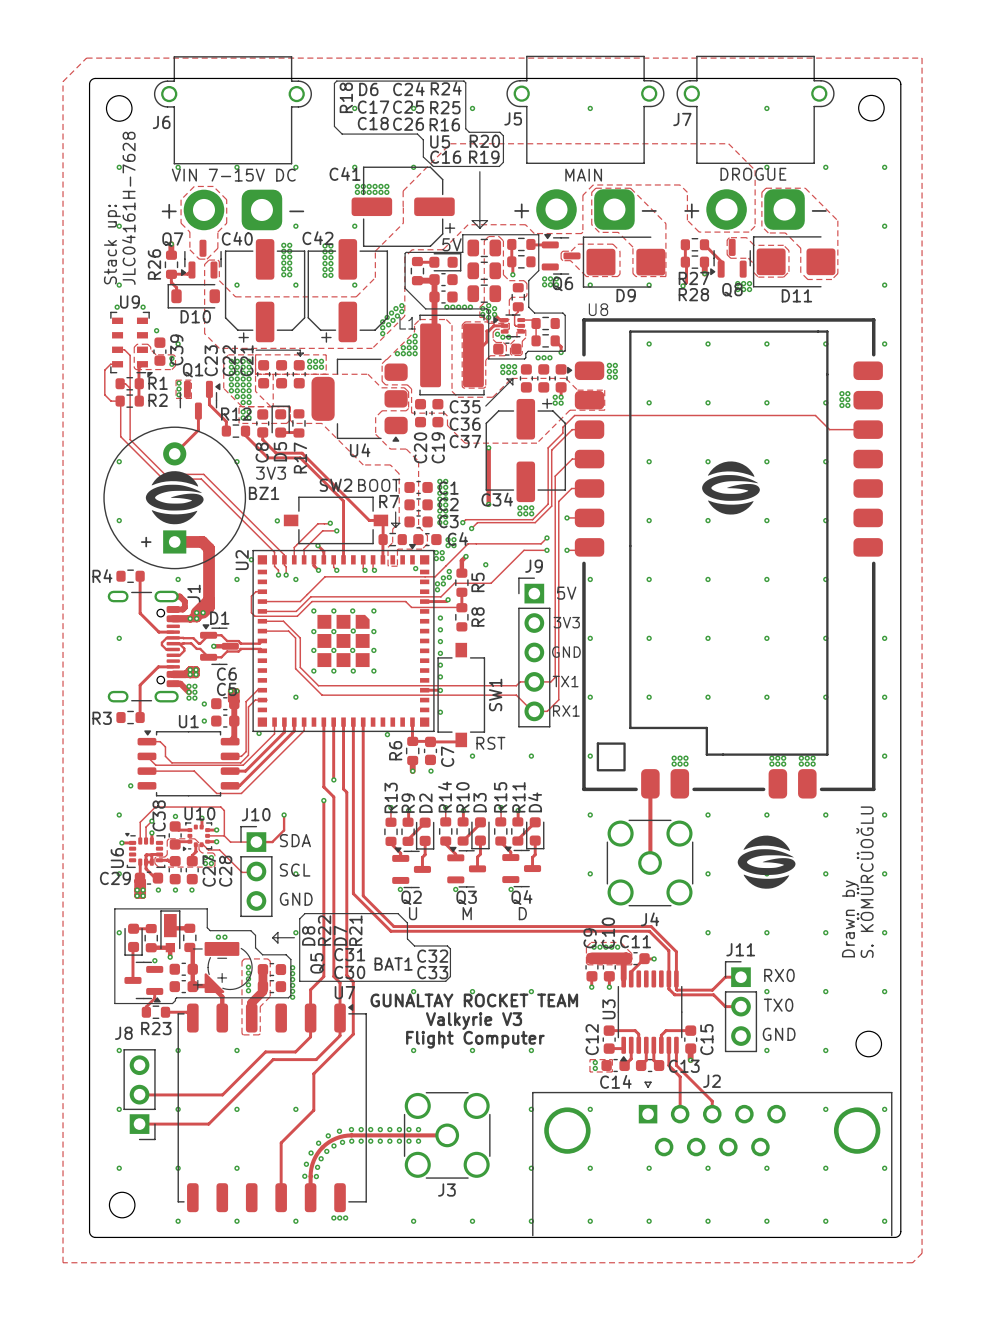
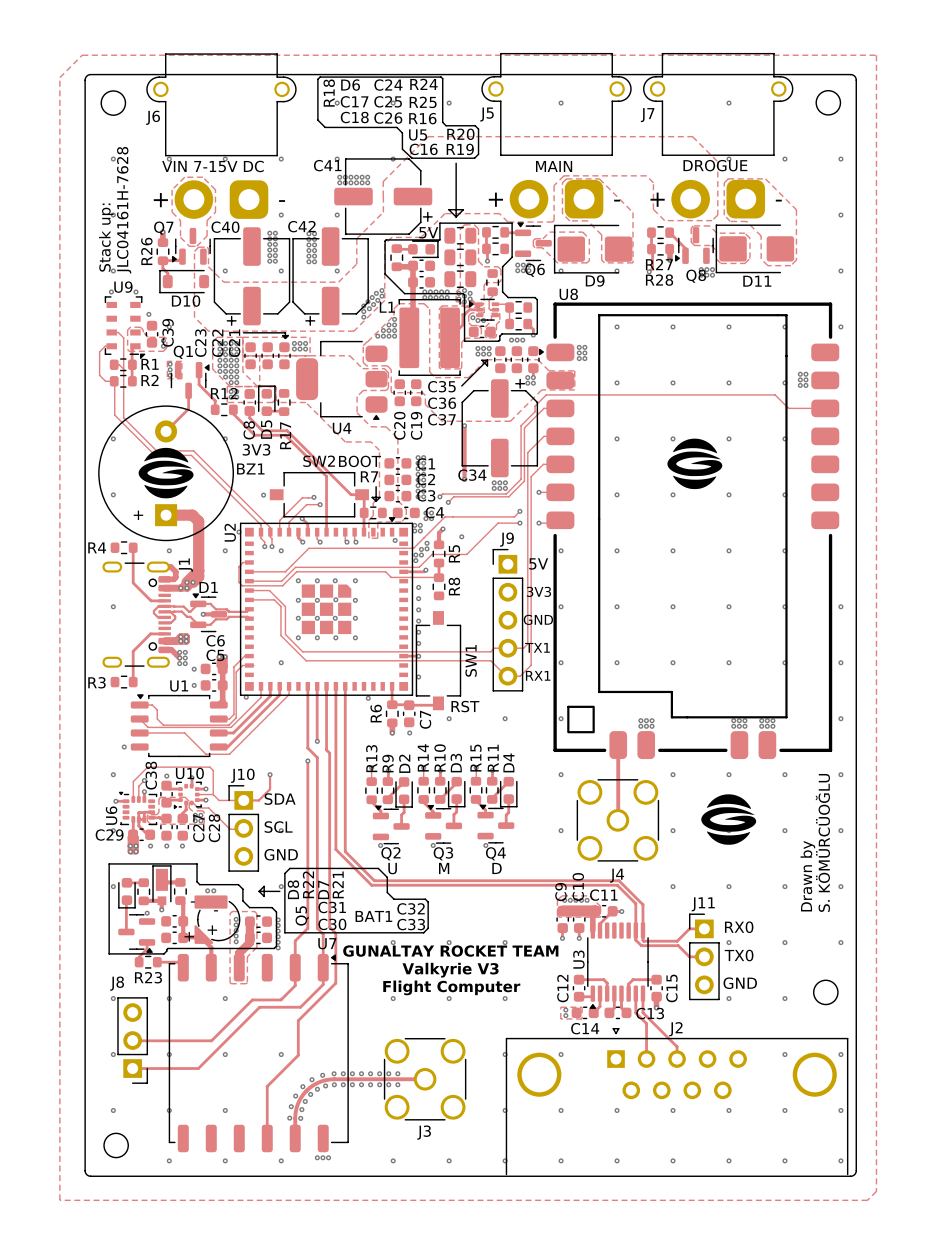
via: none -> (424, 297)
via: none -> (430, 297)
via: none -> (436, 297)
via: none -> (441, 297)
via: none -> (447, 297)

